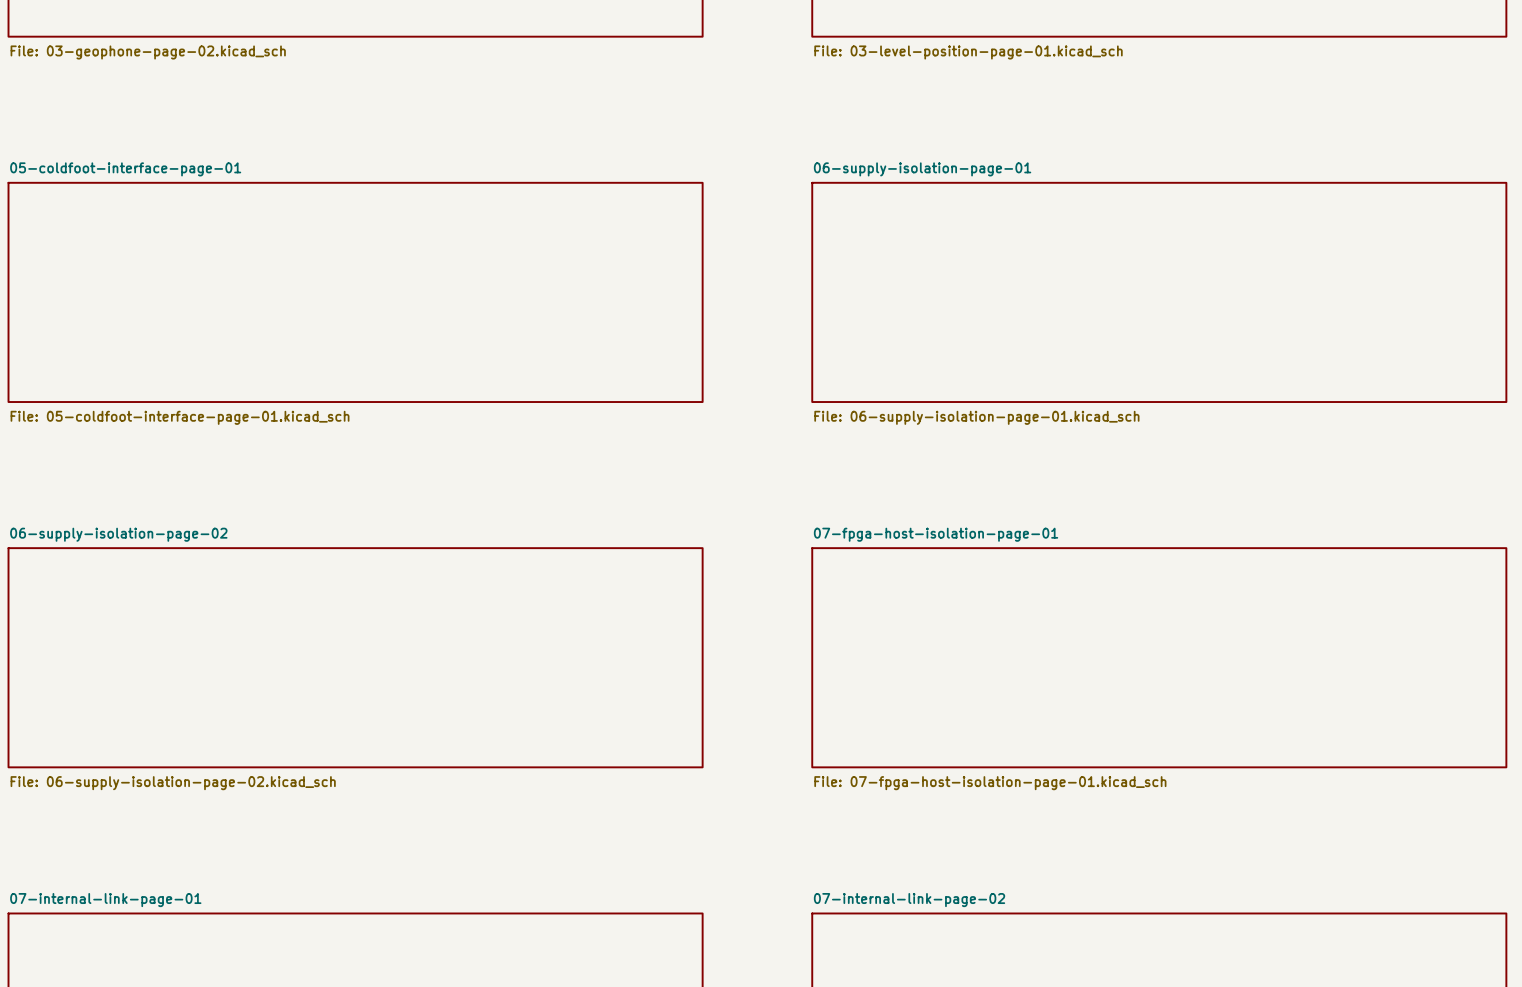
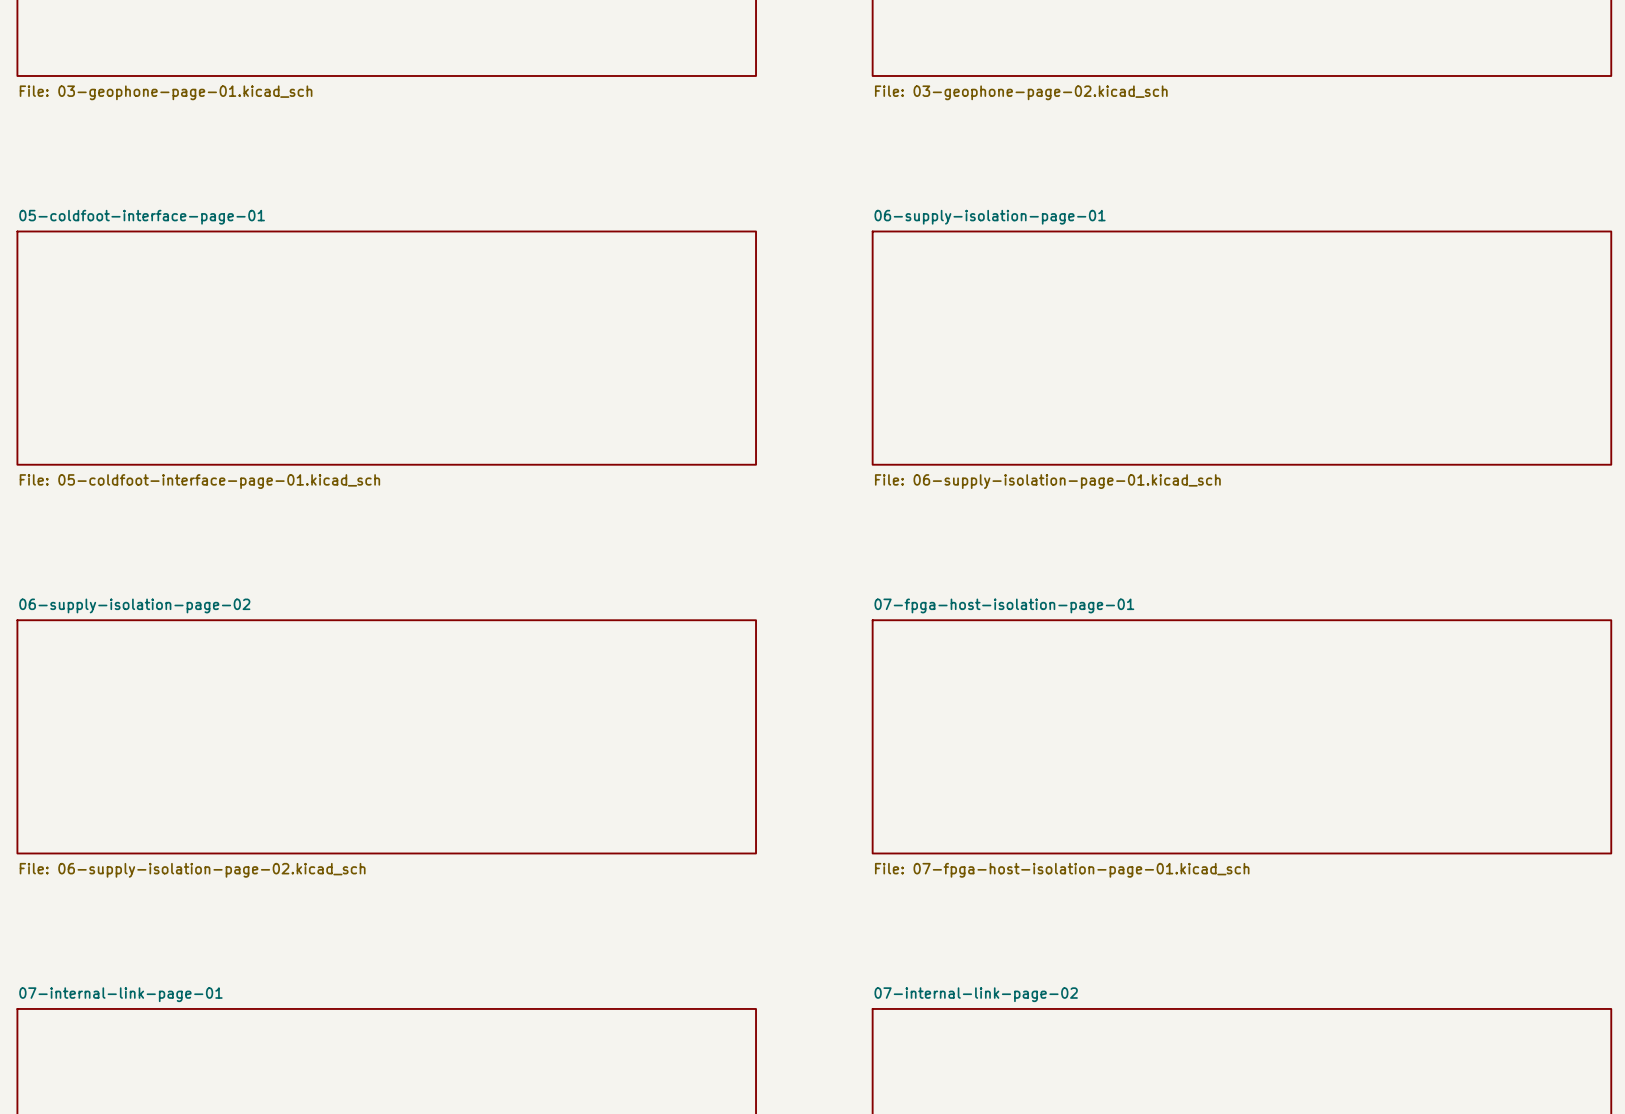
sheet value: File: 03-geophone-page-02.kicad_sch (148, 52) -> File: 03-geophone-page-01.kicad_sch (166, 92)
sheet value: File: 03-level-position-page-01.kicad_sch (968, 52) -> File: 03-geophone-page-02.kicad_sch (1021, 92)

